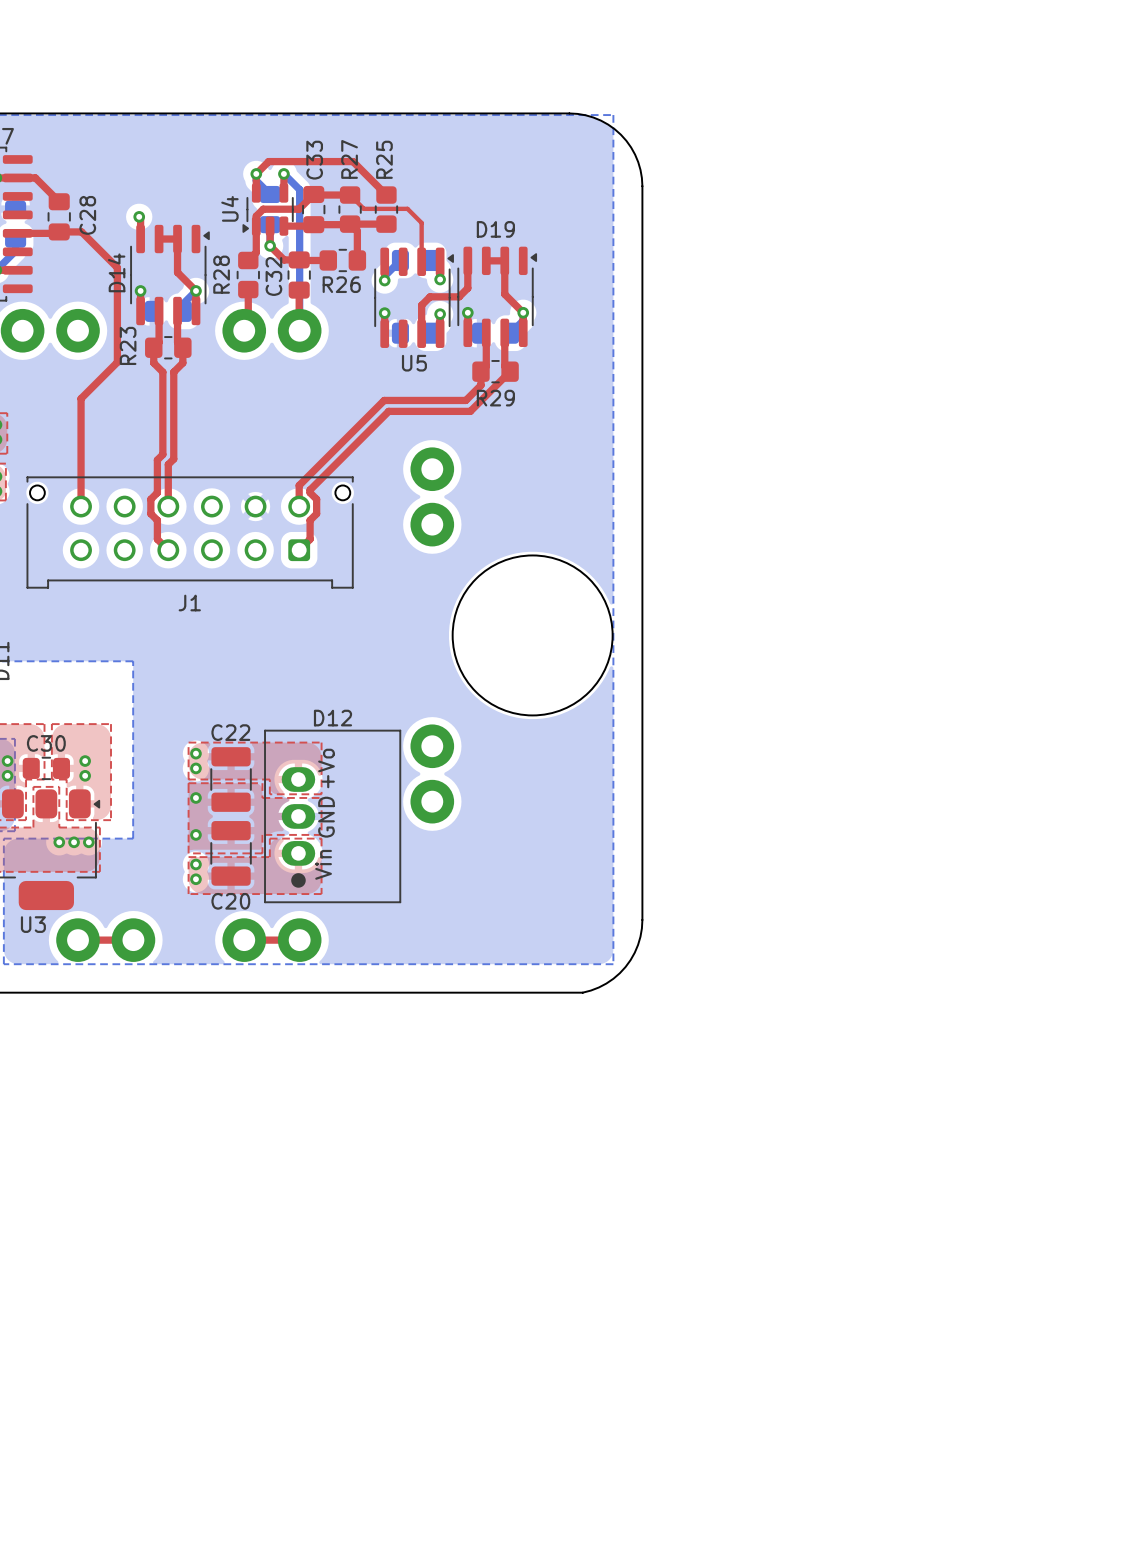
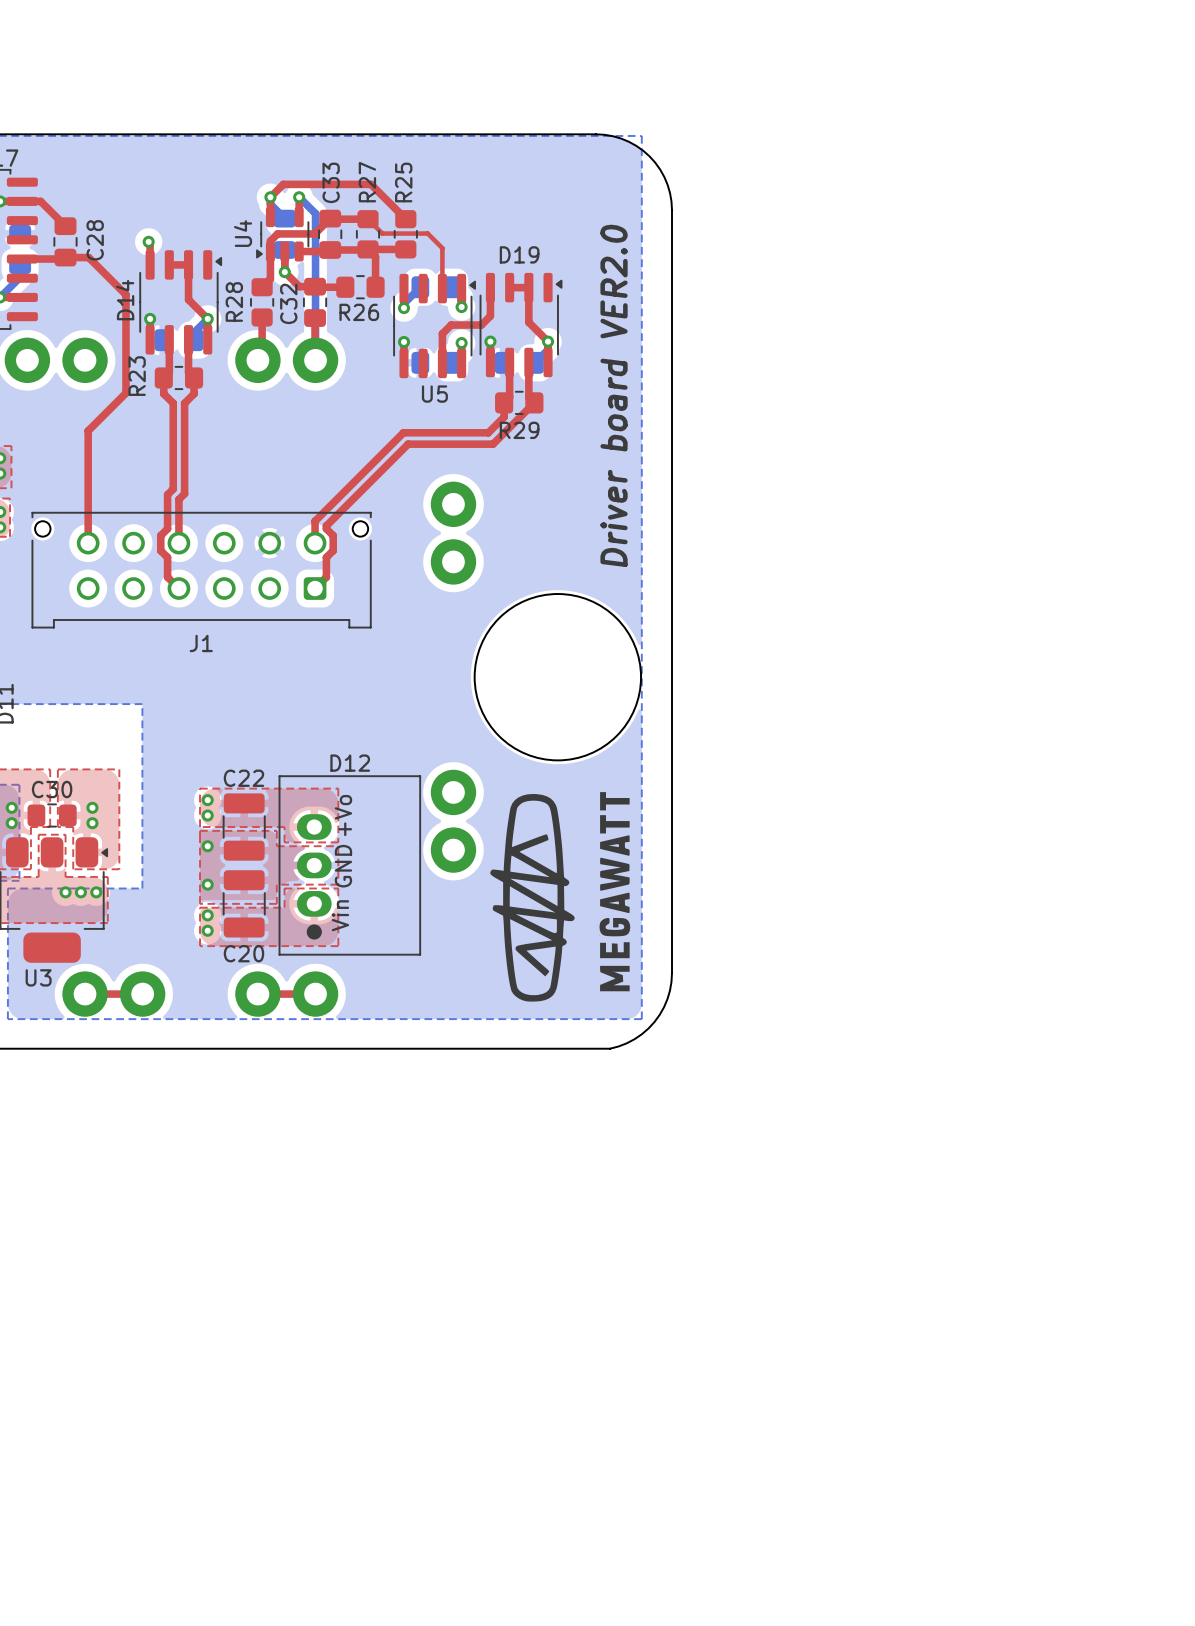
text: none -> Driver board VER2.0 (614, 395)
drawing: none -> [490, 792, 631, 1002]

